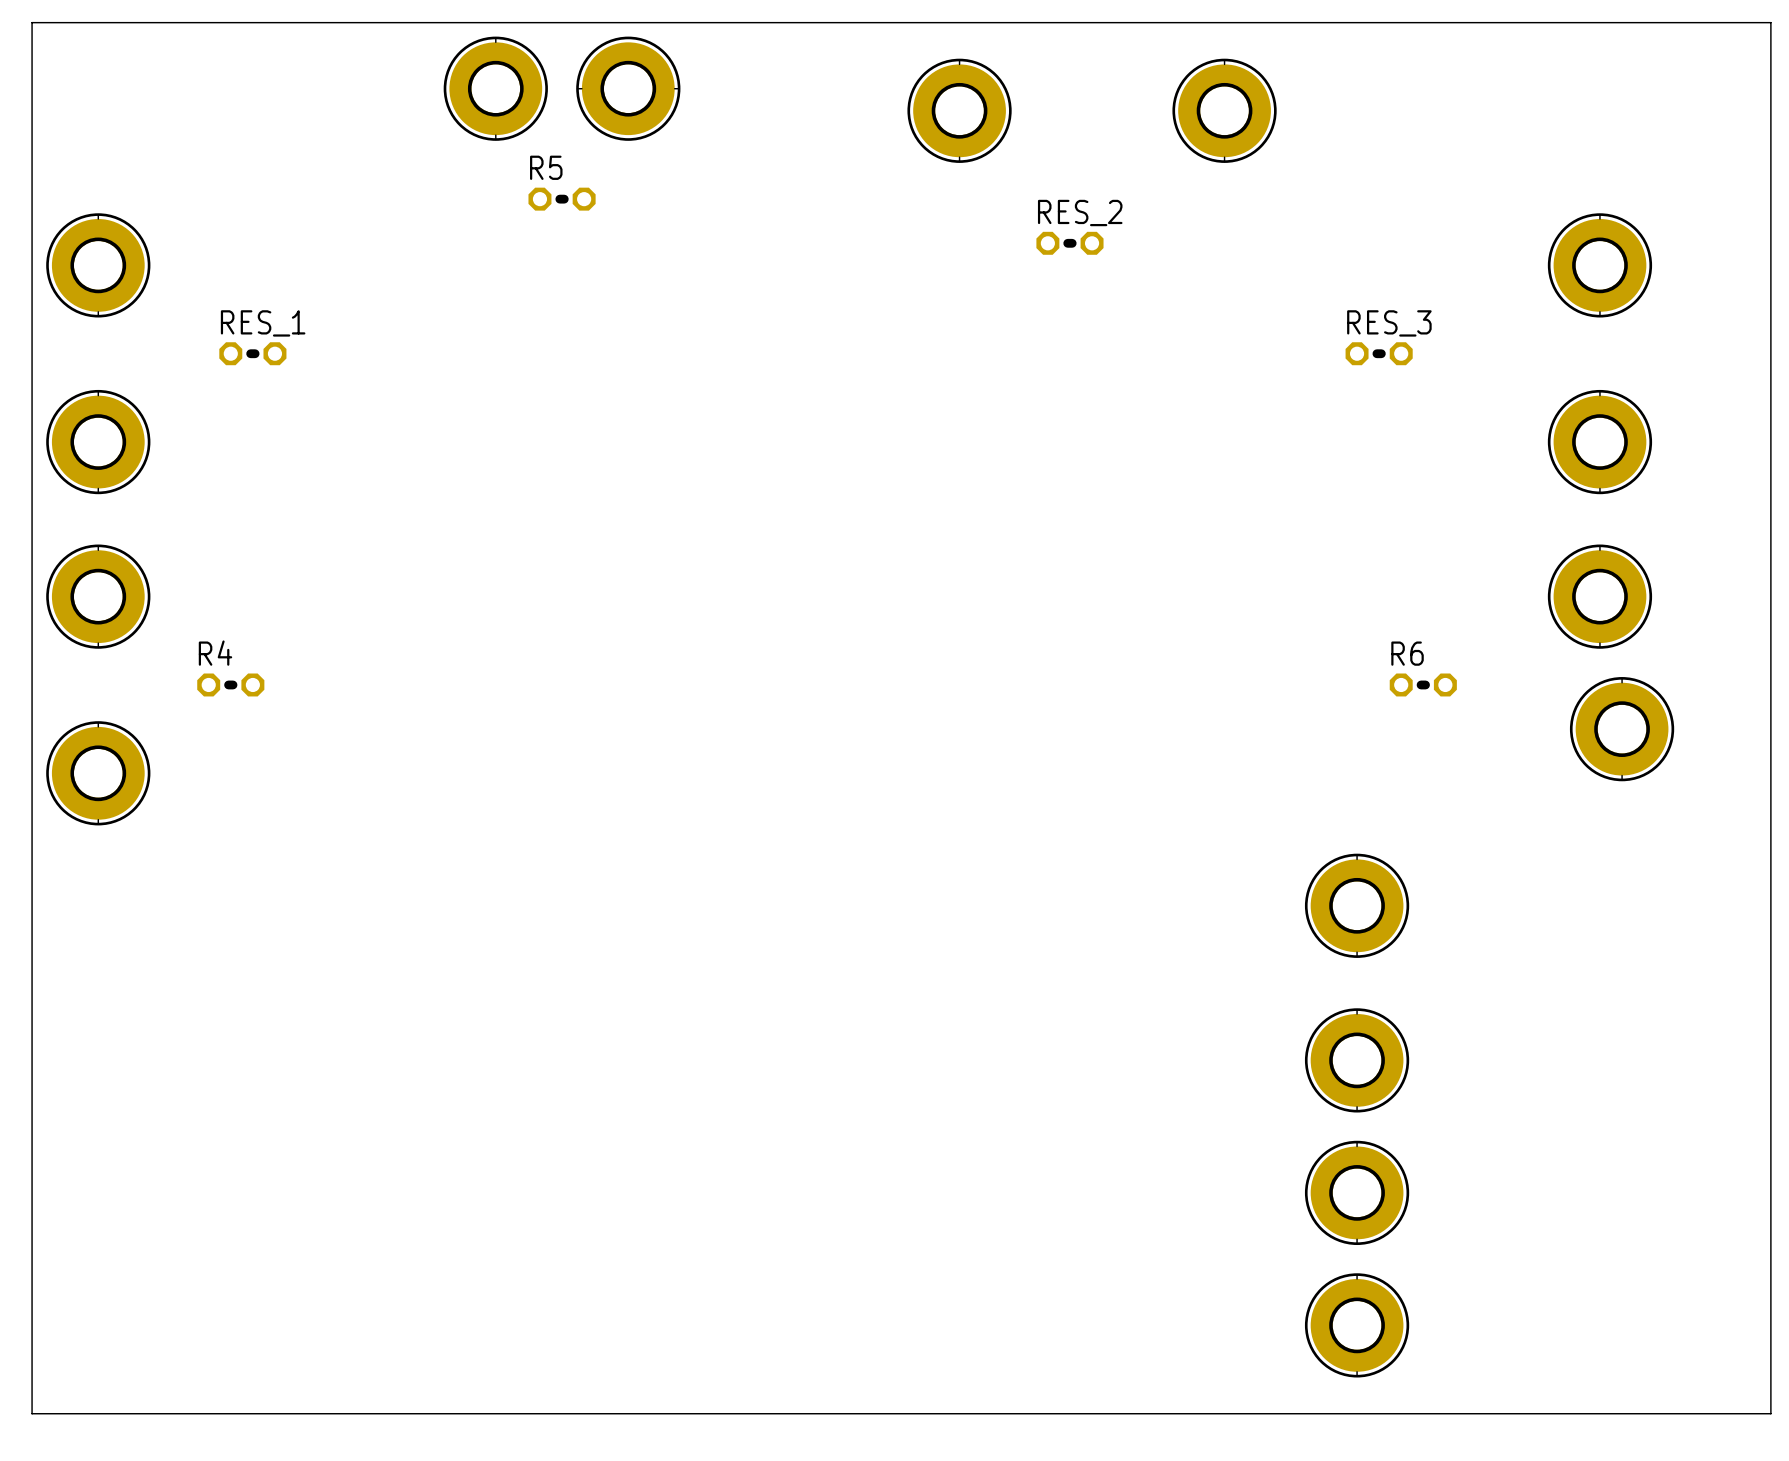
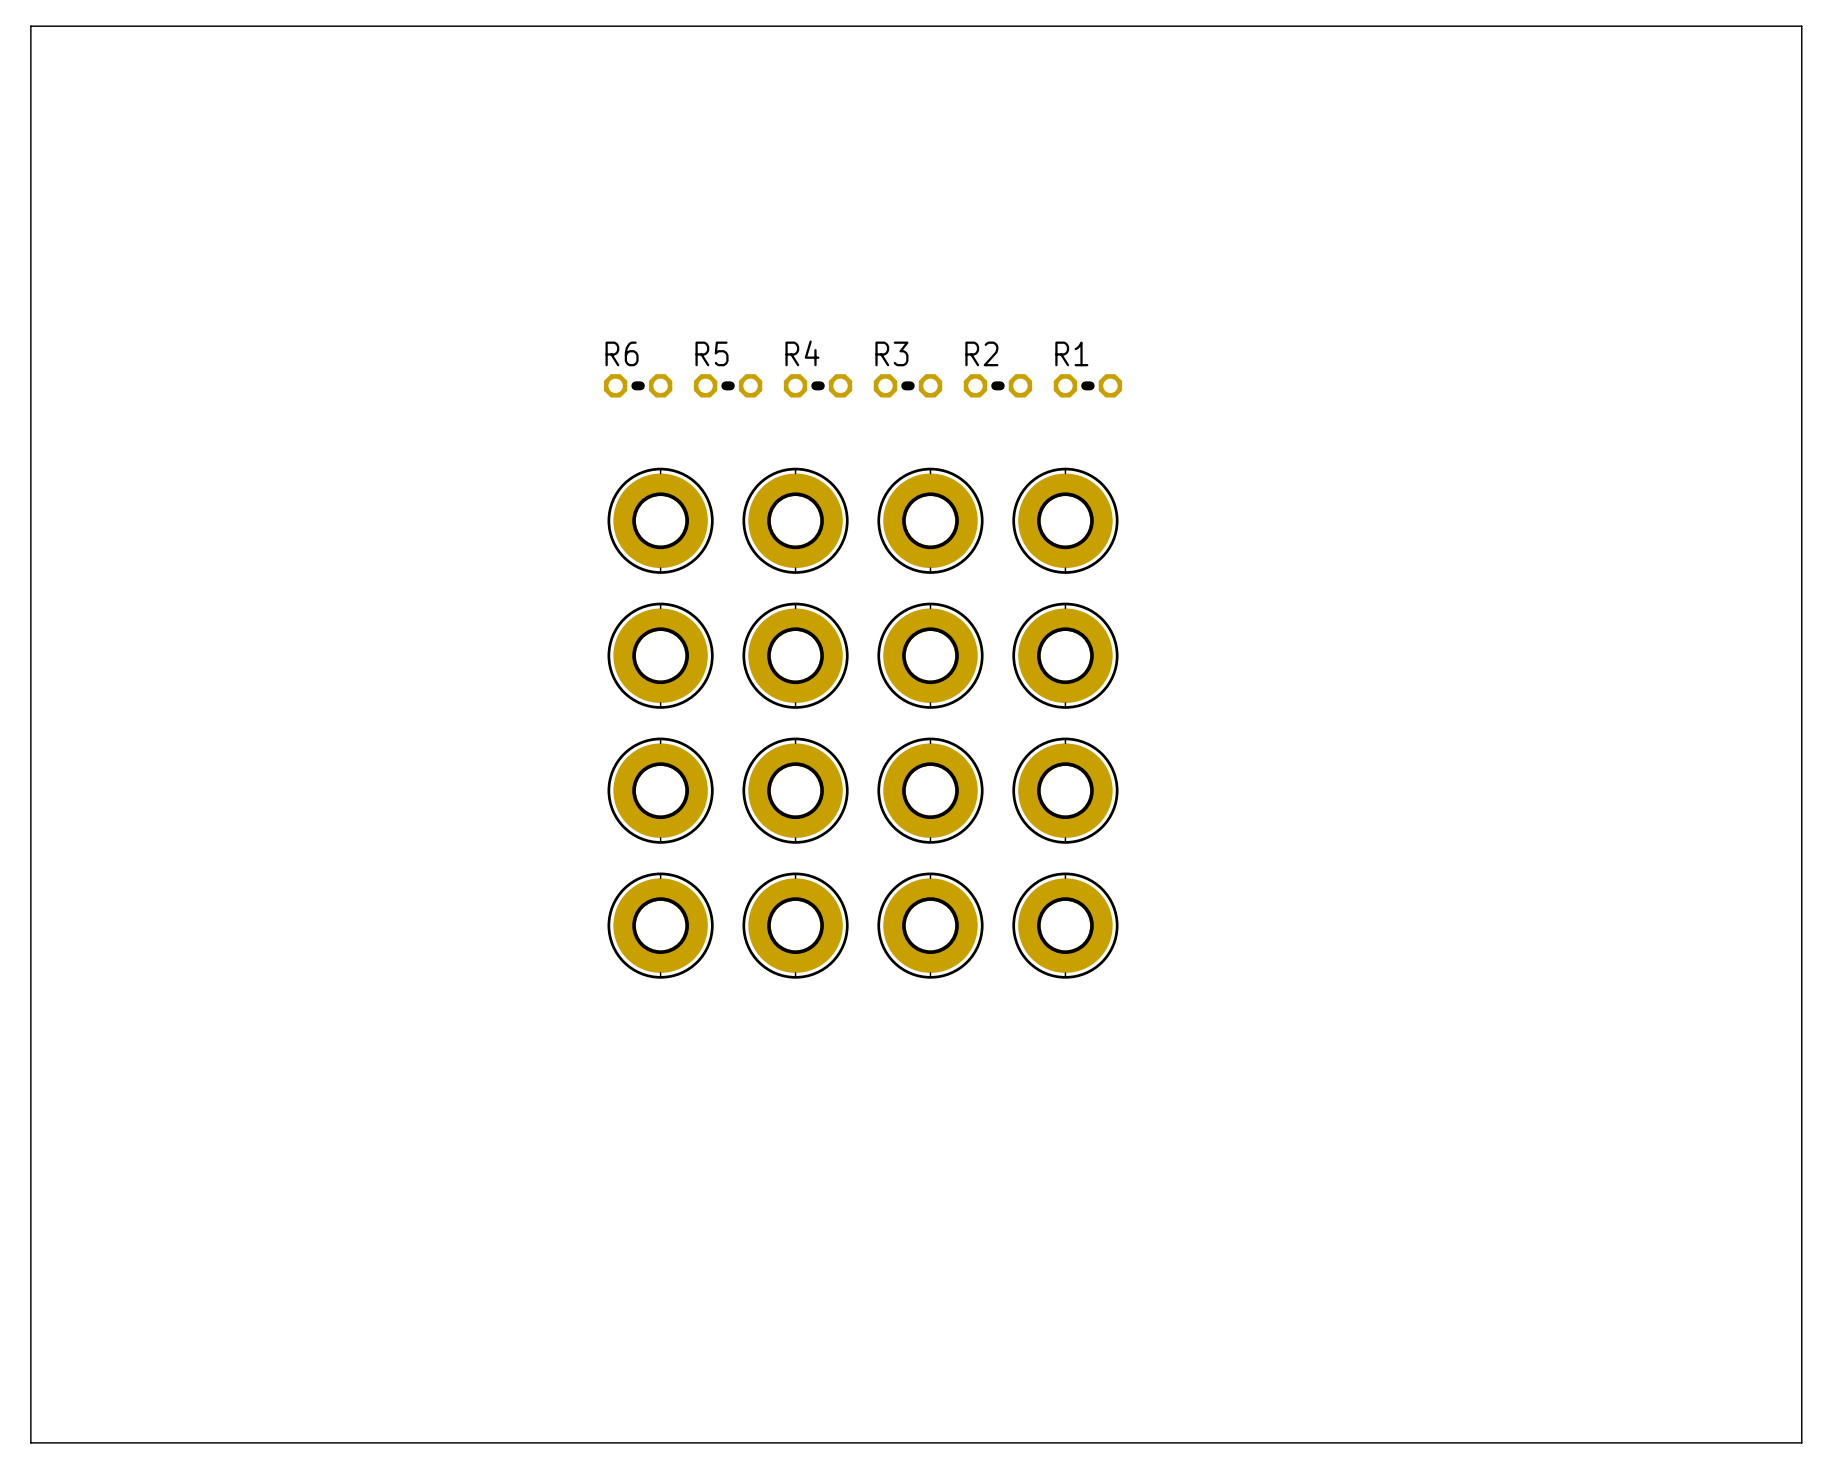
part: (495, 88) -> none
part: (628, 88) -> none
part: (959, 110) -> none
part: (1224, 110) -> none
R5 position: (562, 199) -> (728, 385)
RES_2: (1069, 243) -> none
part: (98, 265) -> none
part: (1599, 265) -> none
RES_1: (252, 353) -> none
RES_3: (1379, 353) -> none
R3: none -> (907, 385)
R2: none -> (997, 385)
R1: none -> (1087, 385)
part: (98, 442) -> none
part: (1599, 442) -> none
part: none -> (660, 520)
part: none -> (795, 520)
part: none -> (930, 520)
part: none -> (1065, 520)
part: (98, 596) -> none
part: (1599, 596) -> none
part: none -> (660, 655)
part: none -> (795, 655)
part: none -> (930, 655)
part: none -> (1065, 655)
R4 position: (230, 684) -> (818, 385)
R6 position: (1423, 684) -> (638, 385)
part: (1622, 729) -> none
part: (98, 773) -> none
part: none -> (660, 790)
part: none -> (795, 790)
part: none -> (930, 790)
part: none -> (1065, 790)
part: none -> (660, 925)
part: none -> (795, 925)
part: none -> (930, 925)
part: none -> (1065, 925)
part: (1357, 905) -> none
part: (1357, 1060) -> none
part: (1357, 1192) -> none
part: (1357, 1325) -> none

